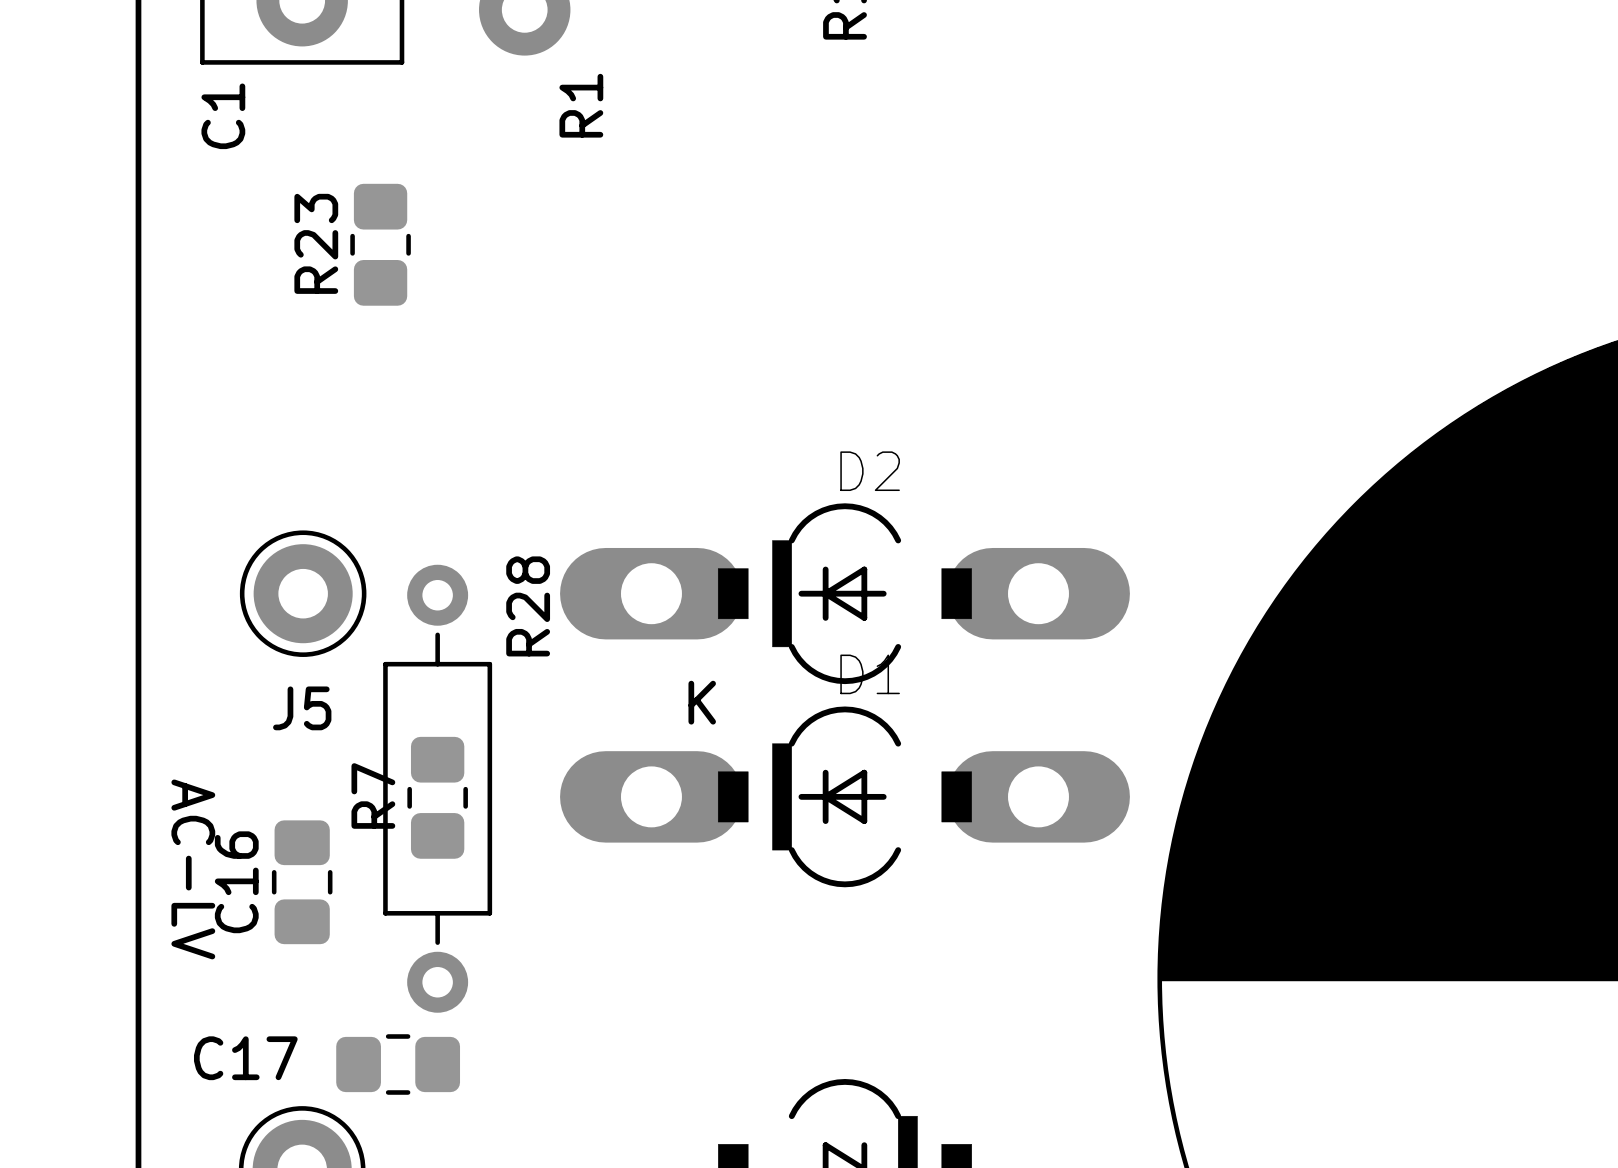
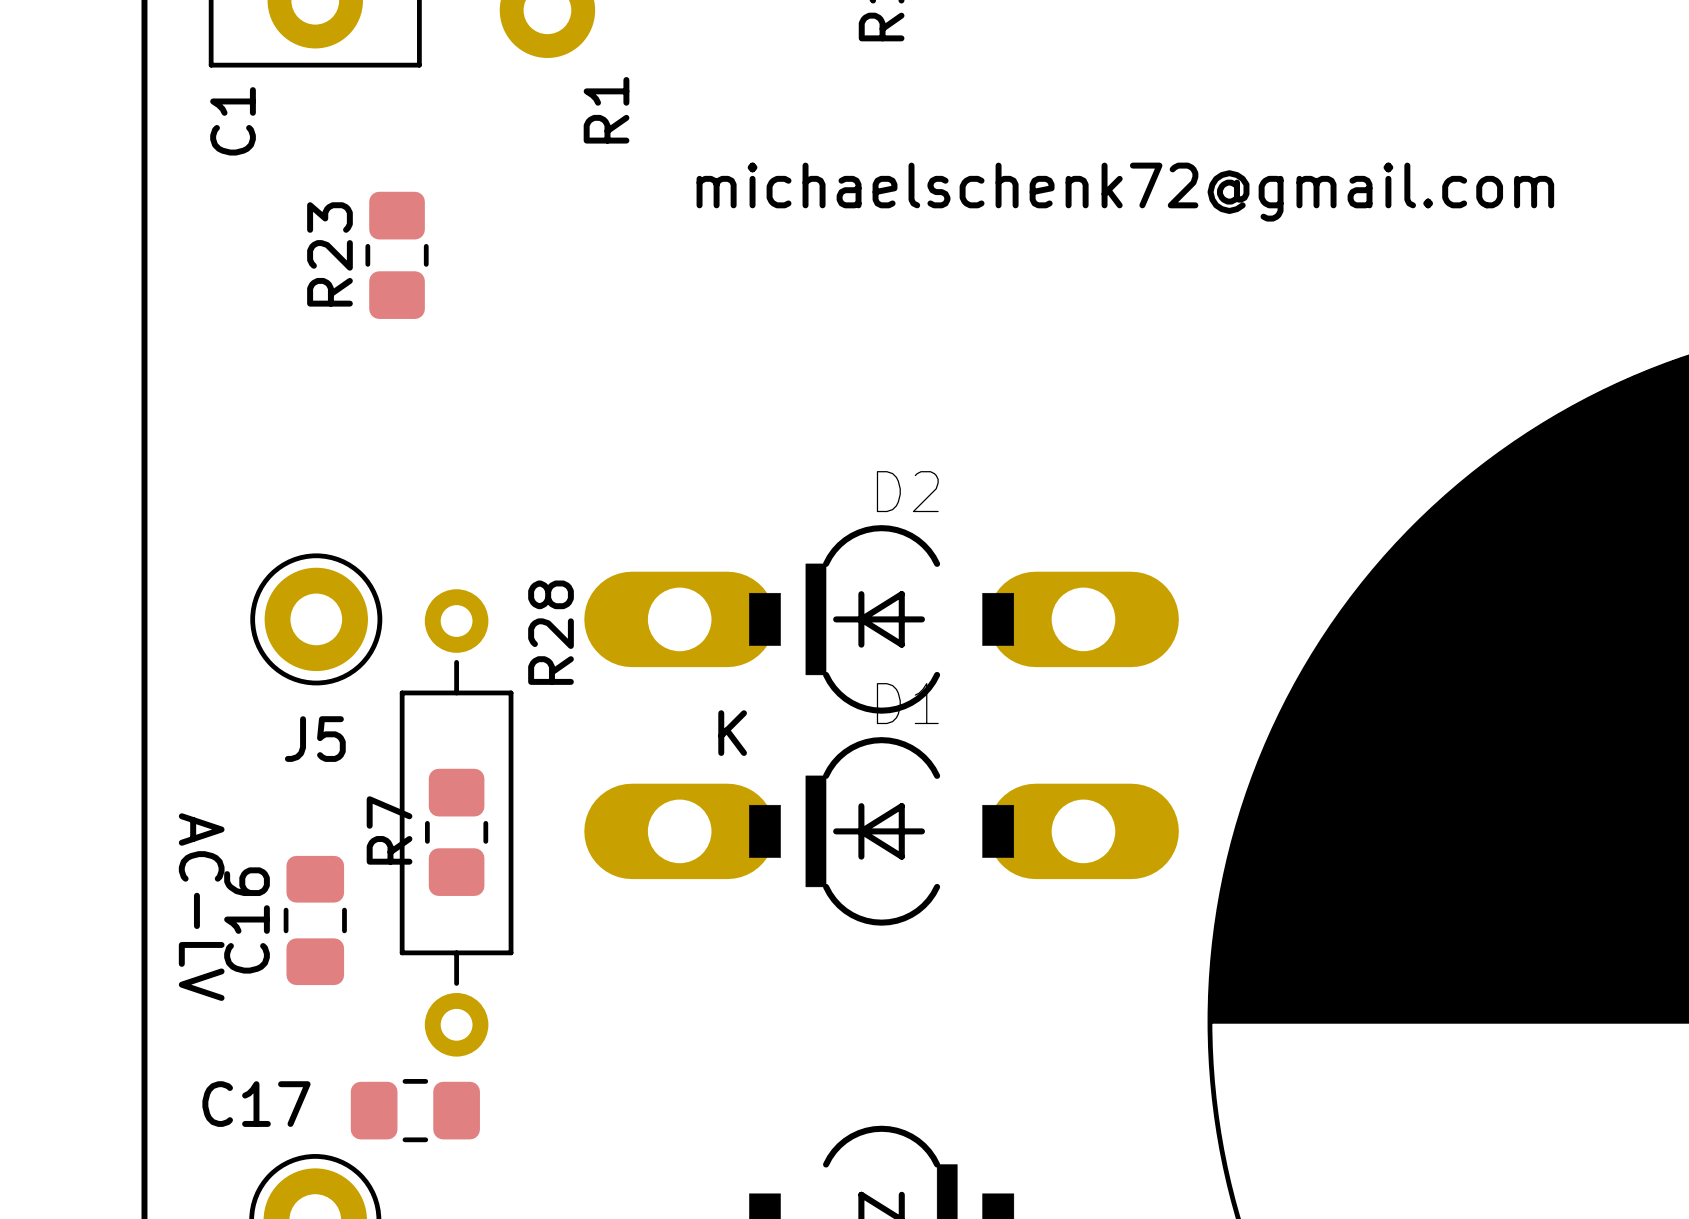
text: none -> michaelschenk72@gmail.com (1125, 192)

